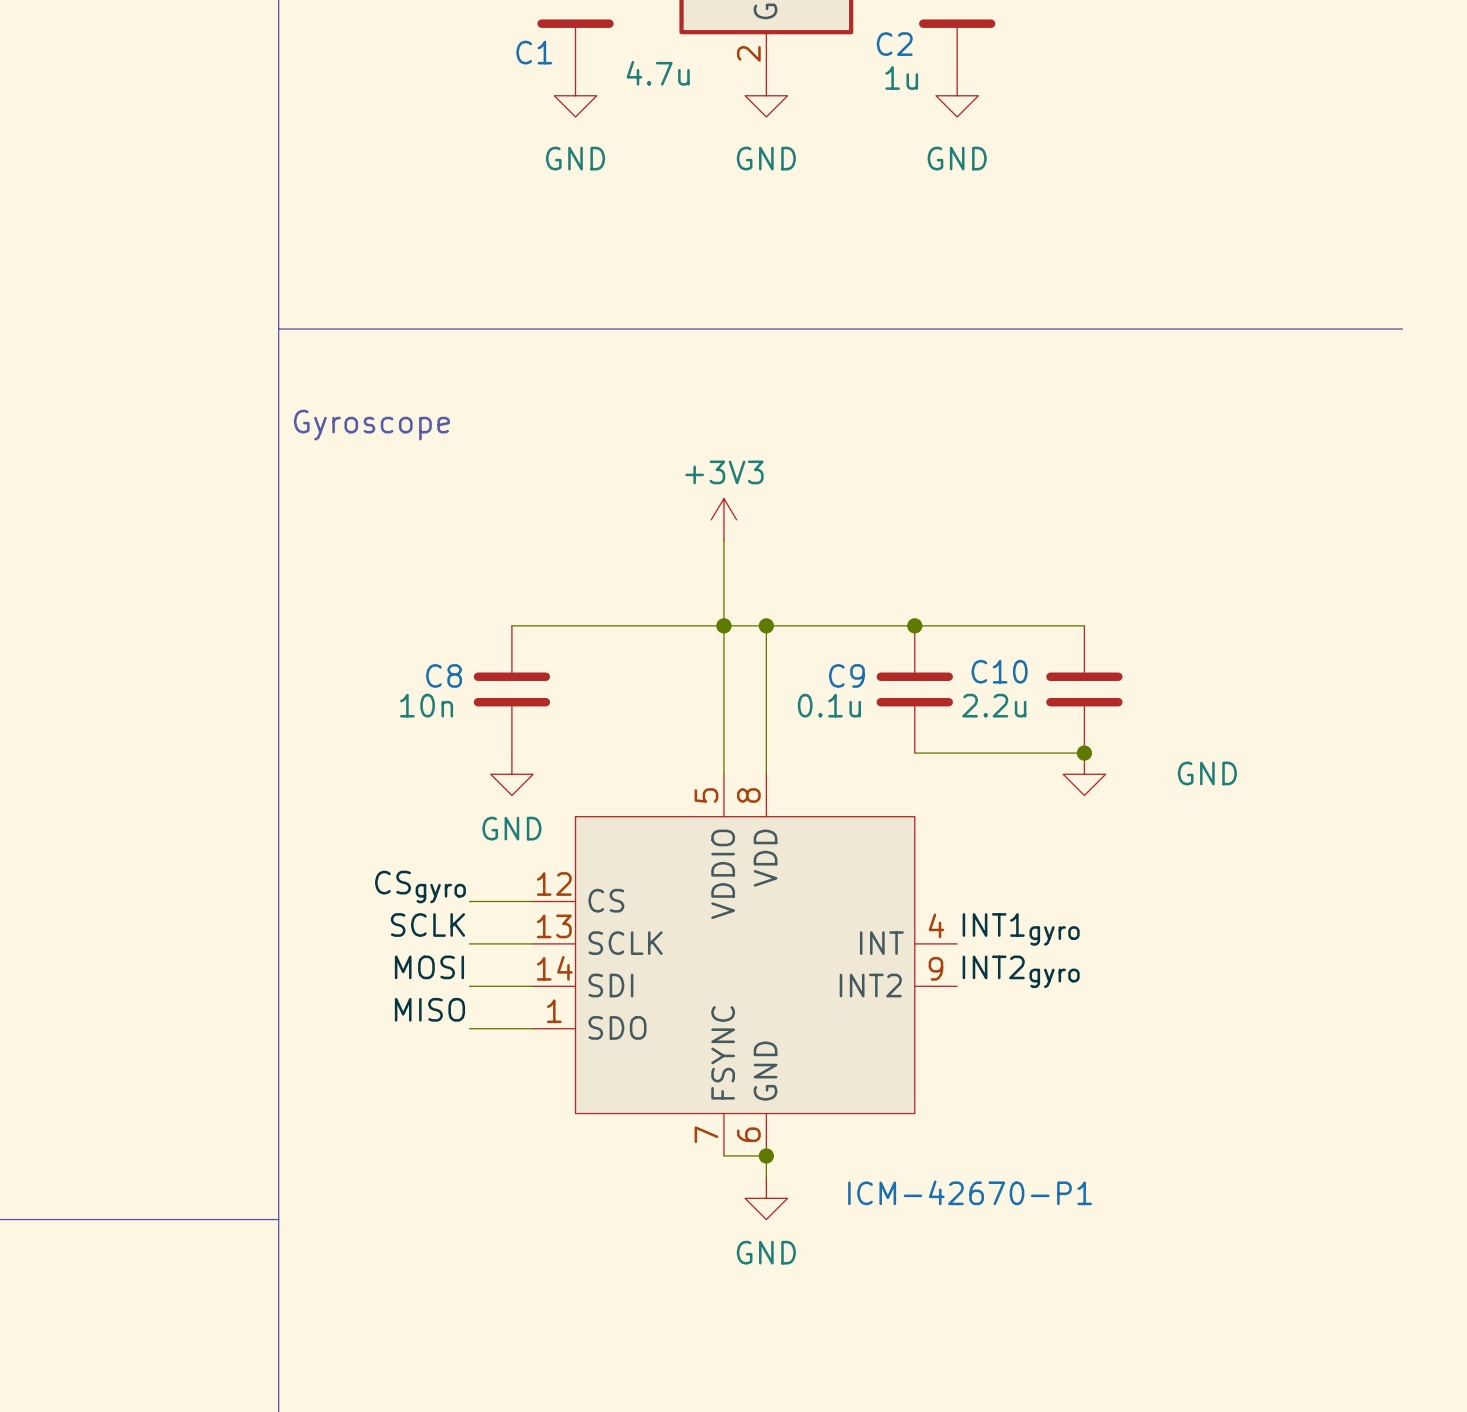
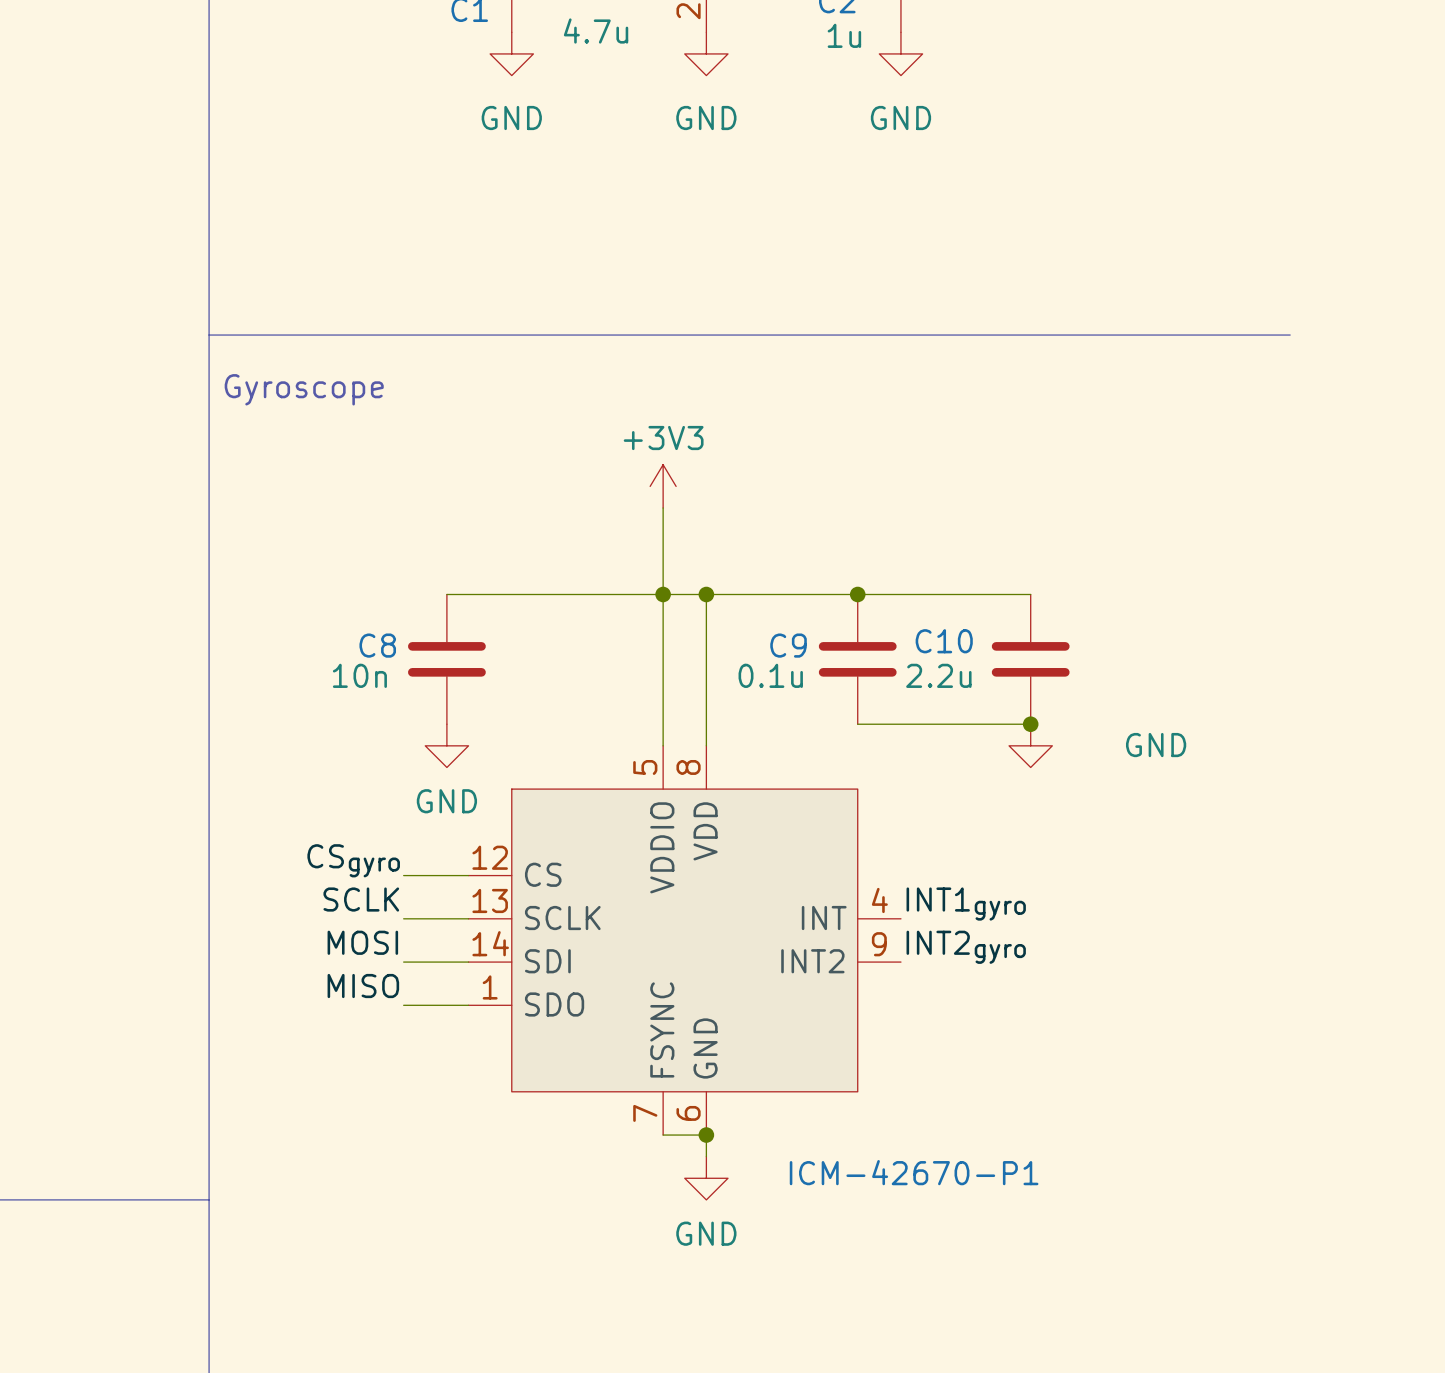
line: (278, 329) (1402, 329) -> none
line: none -> (209, 335) (1290, 335)

